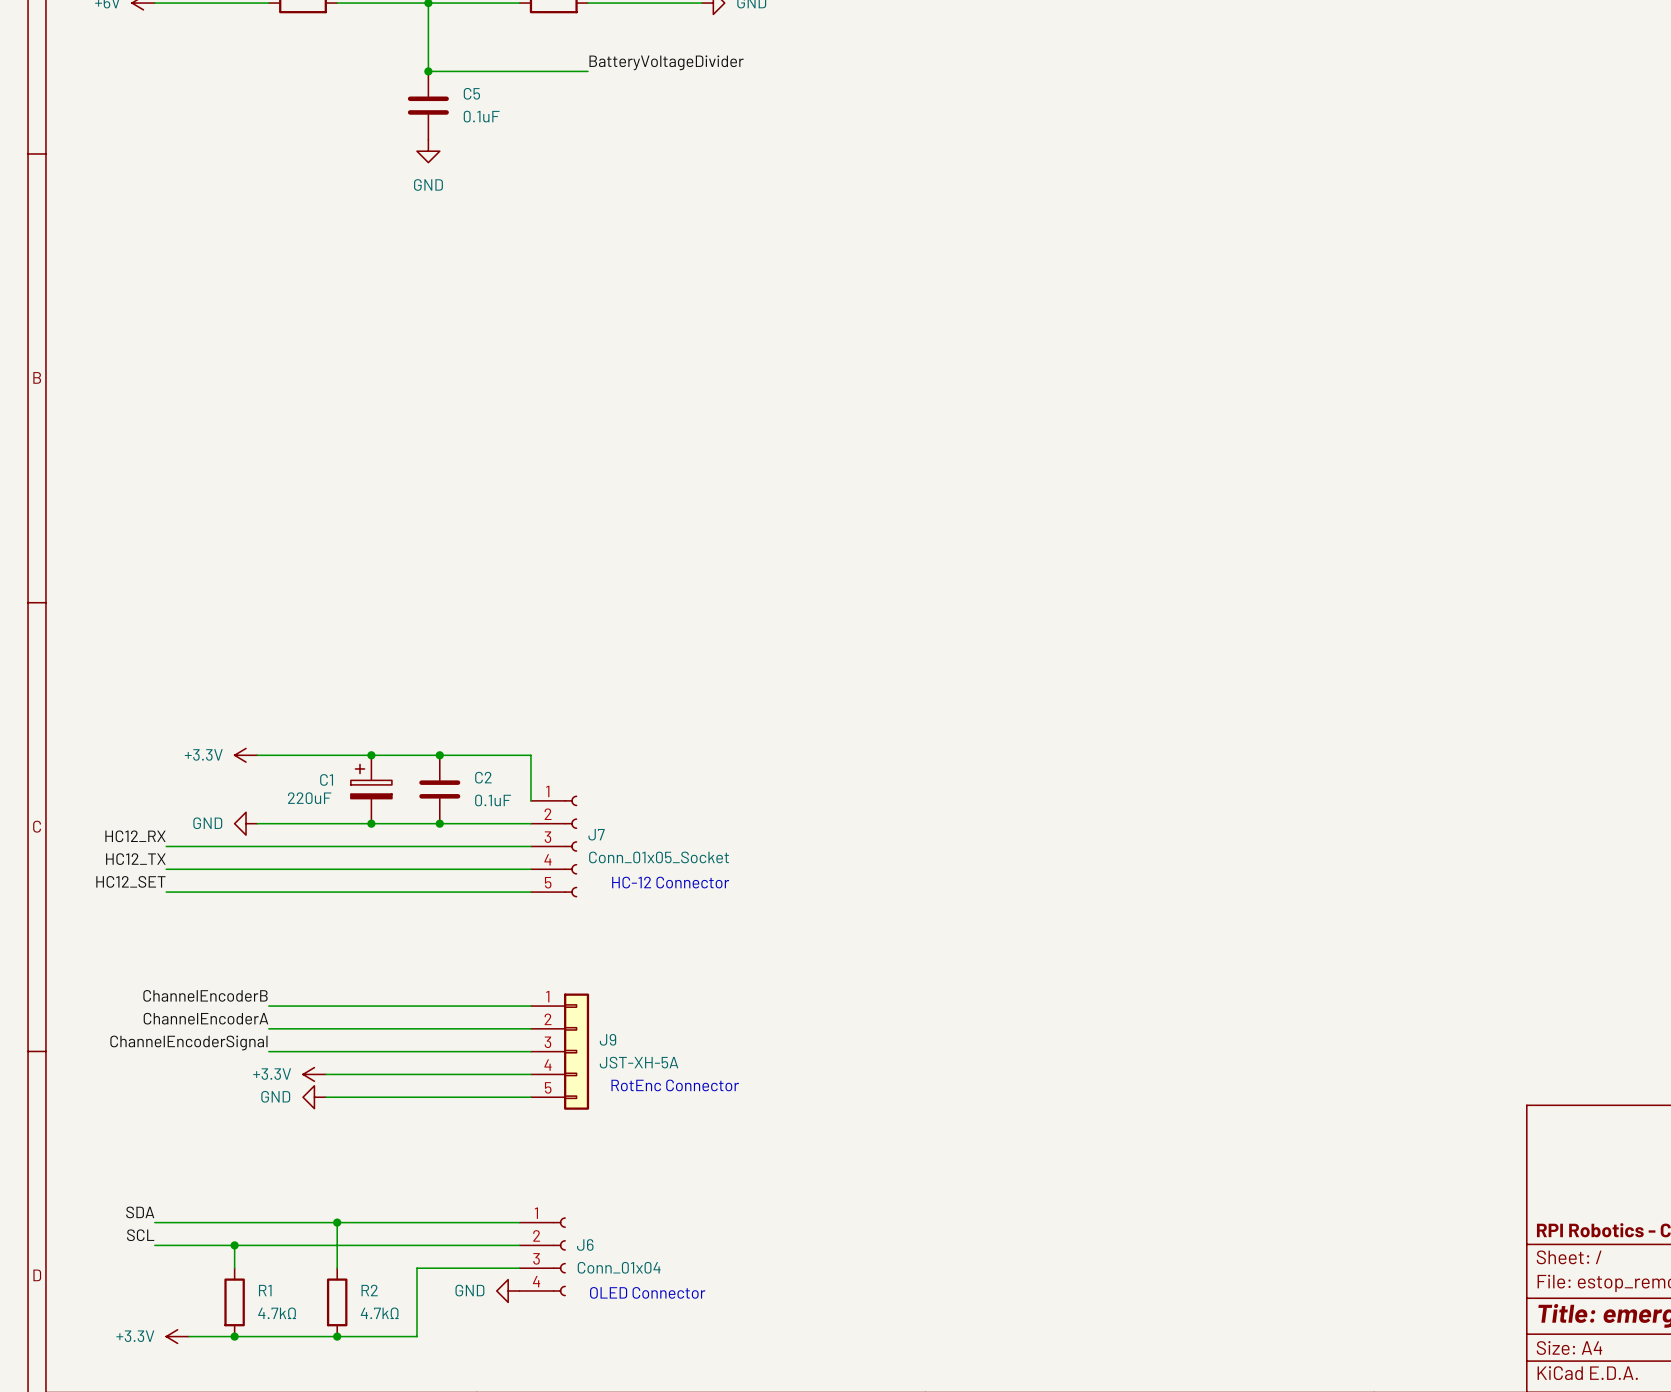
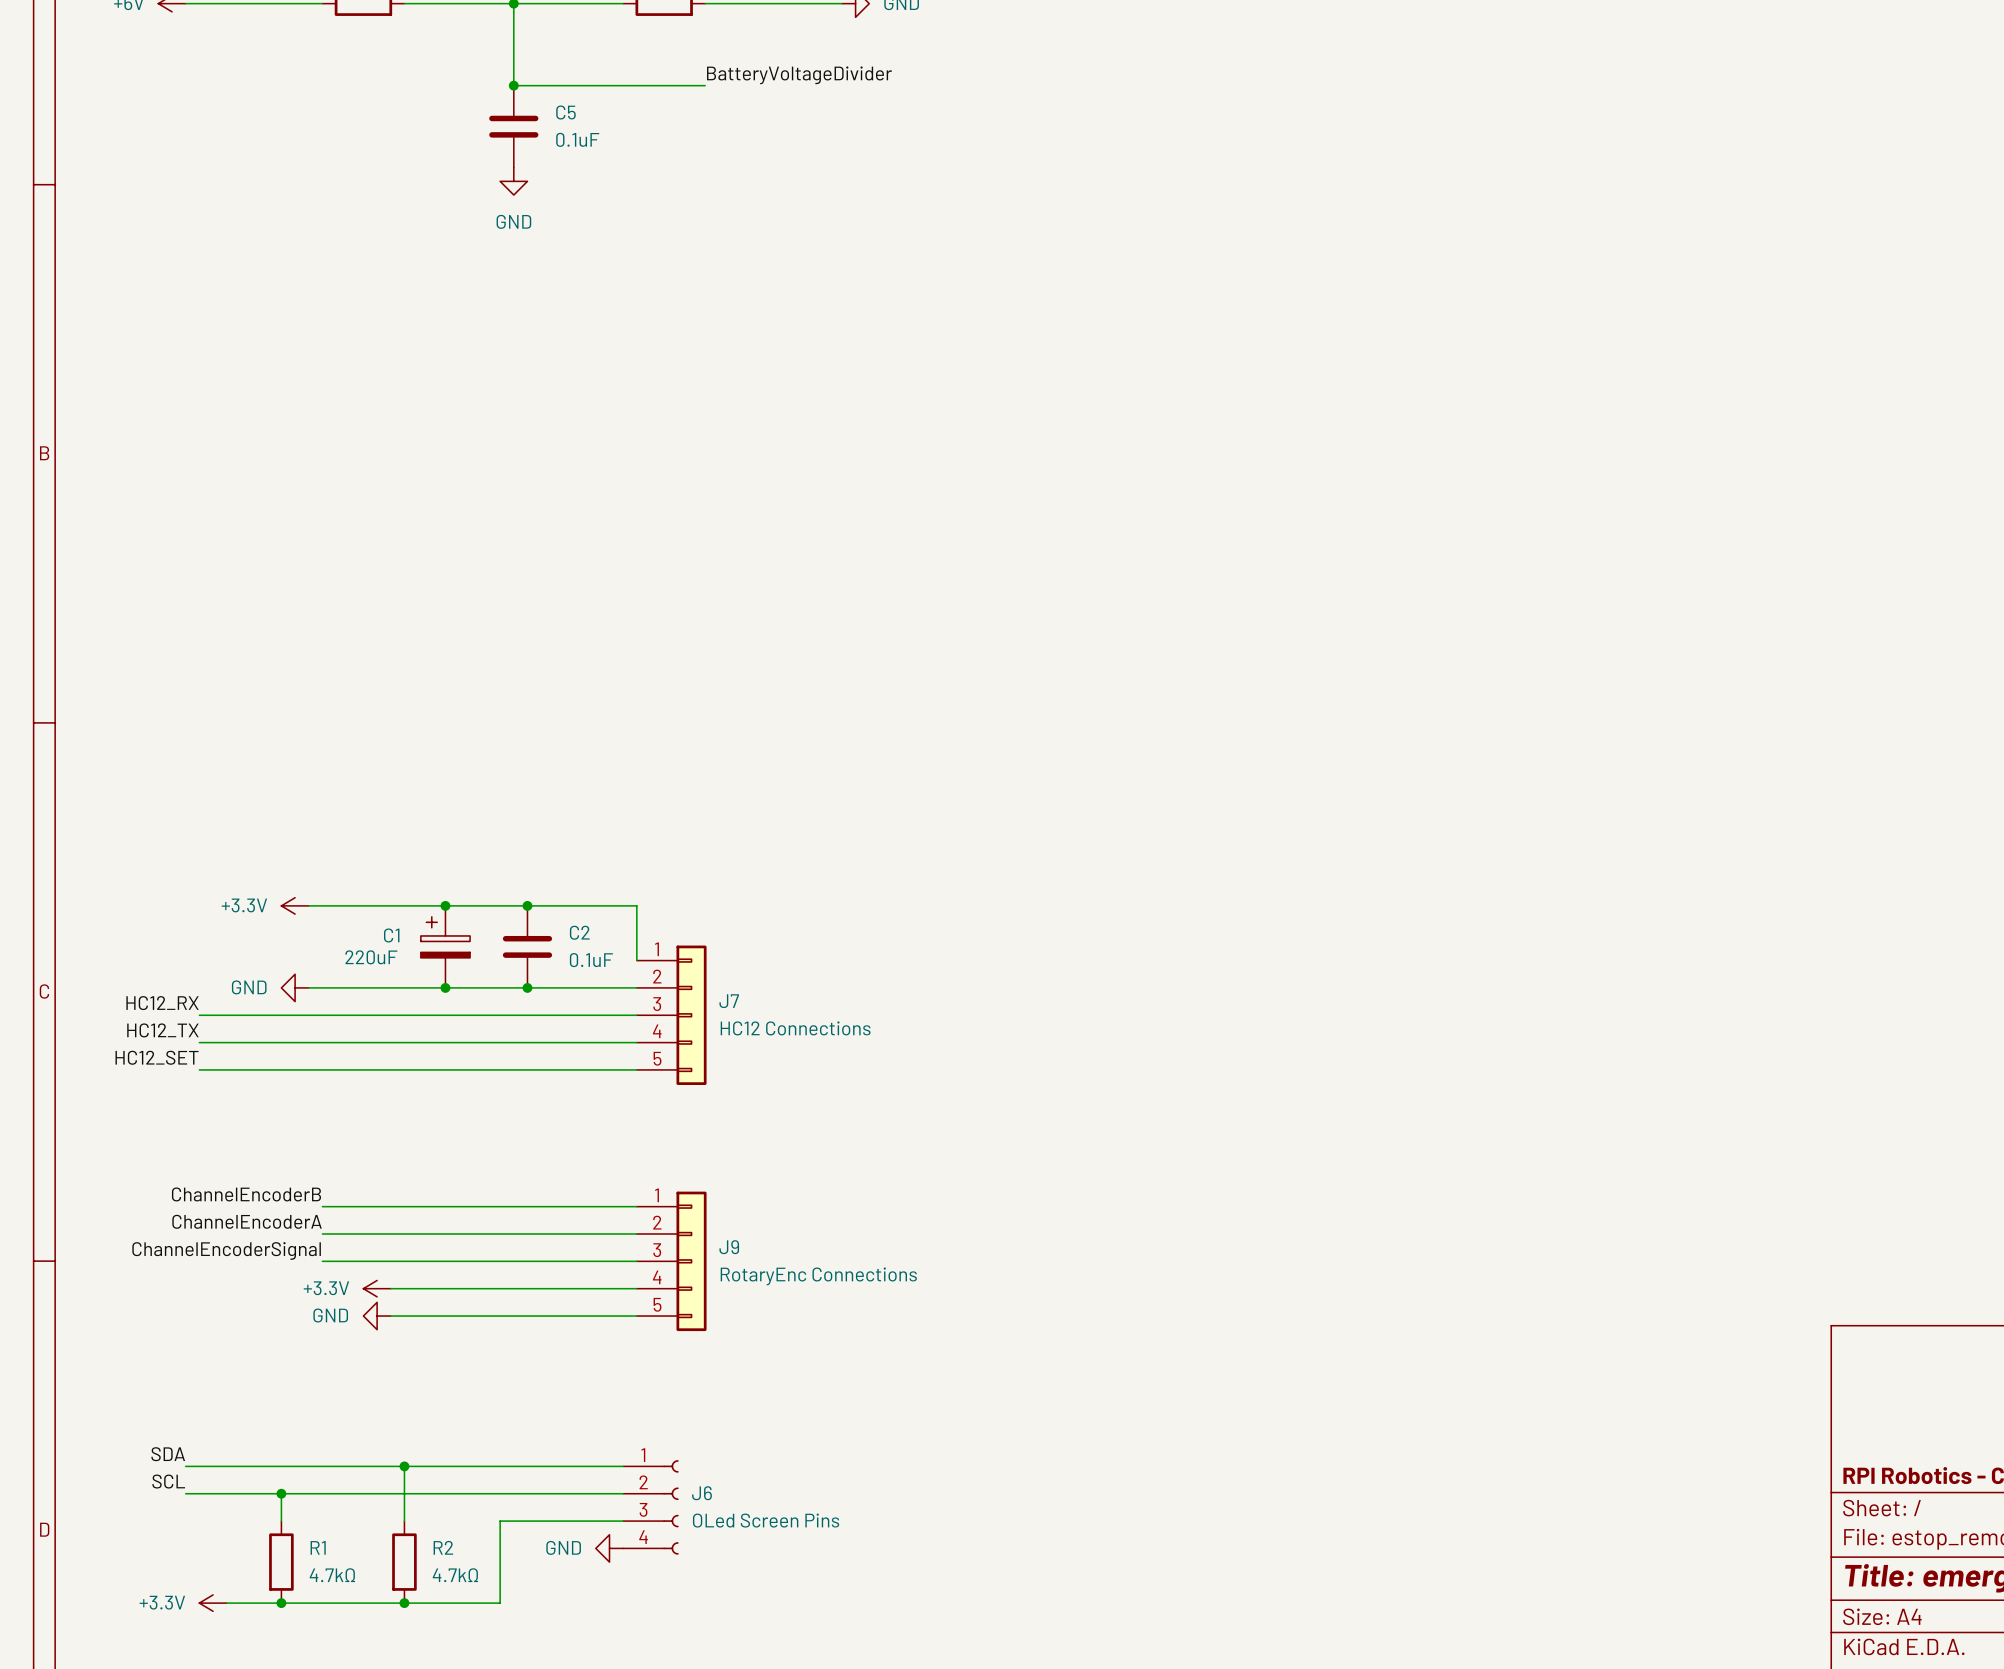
J7 symbol: [530, 795, 578, 898] -> [636, 945, 707, 1085]
J7 value: Conn_01x05_Socket (659, 857) -> HC12 Connections (795, 1028)
text: HC-12 Connector (670, 882) -> none
J9 value: JST-XH-5A (639, 1062) -> RotaryEnc Connections (818, 1276)
text: RotEnc Connector (675, 1085) -> none
J6 value: Conn_01x04 (619, 1267) -> OLed Screen Pins (766, 1520)
text: OLED Connector (647, 1292) -> none

